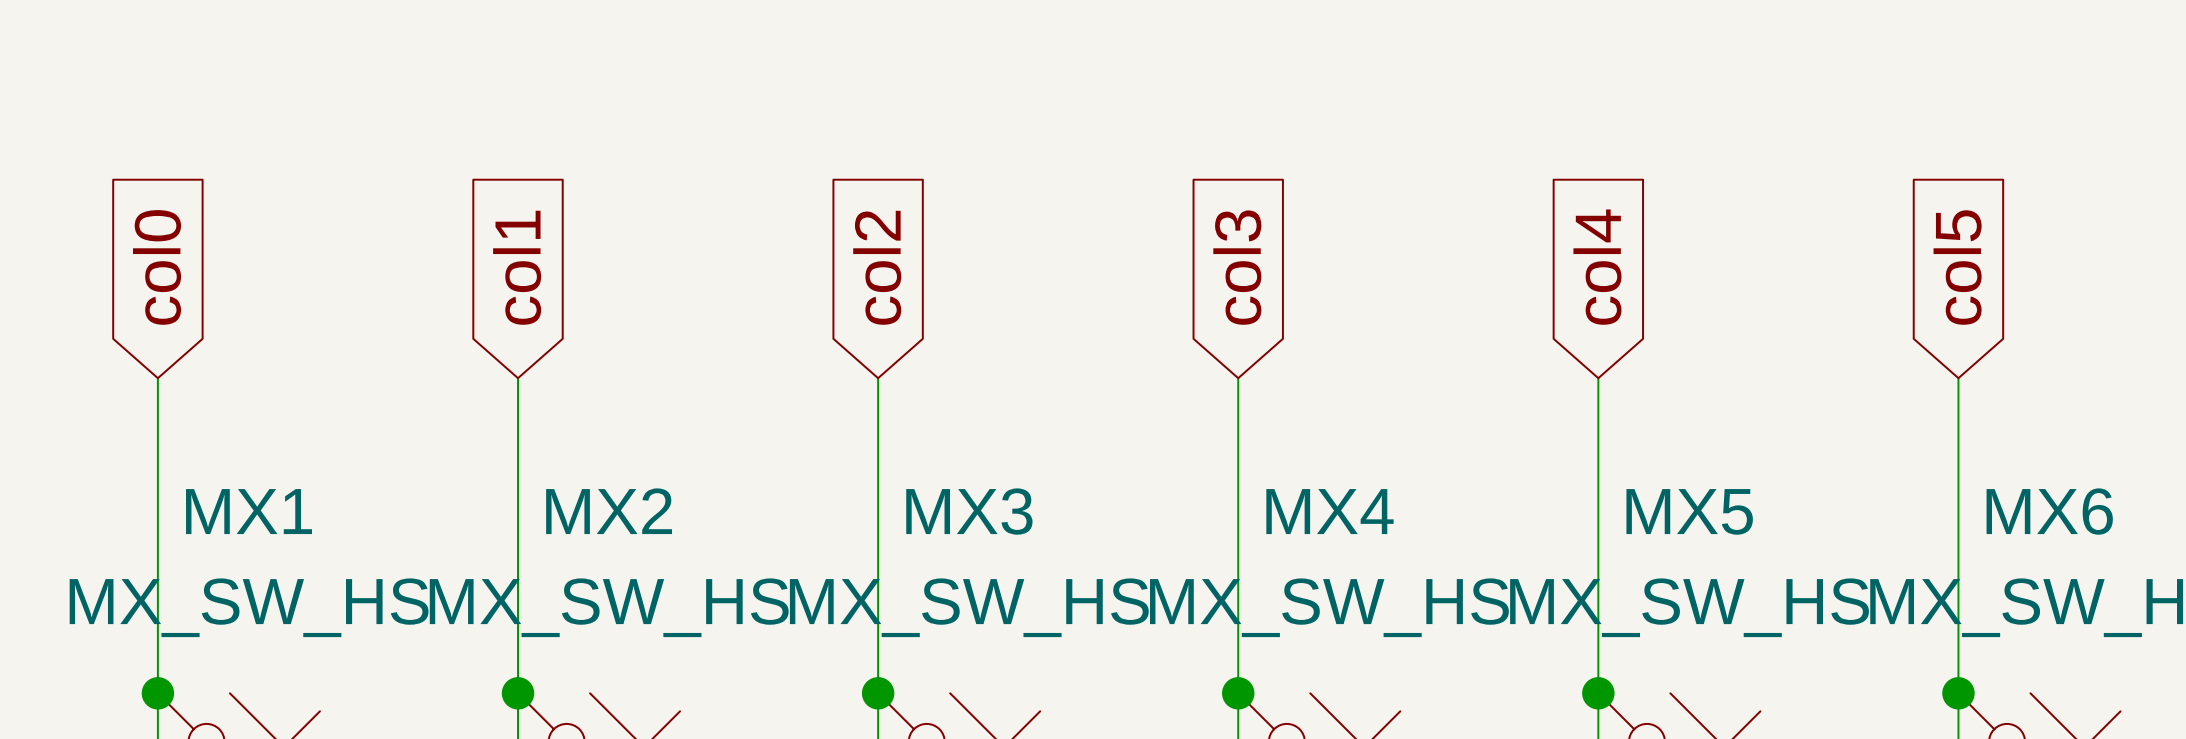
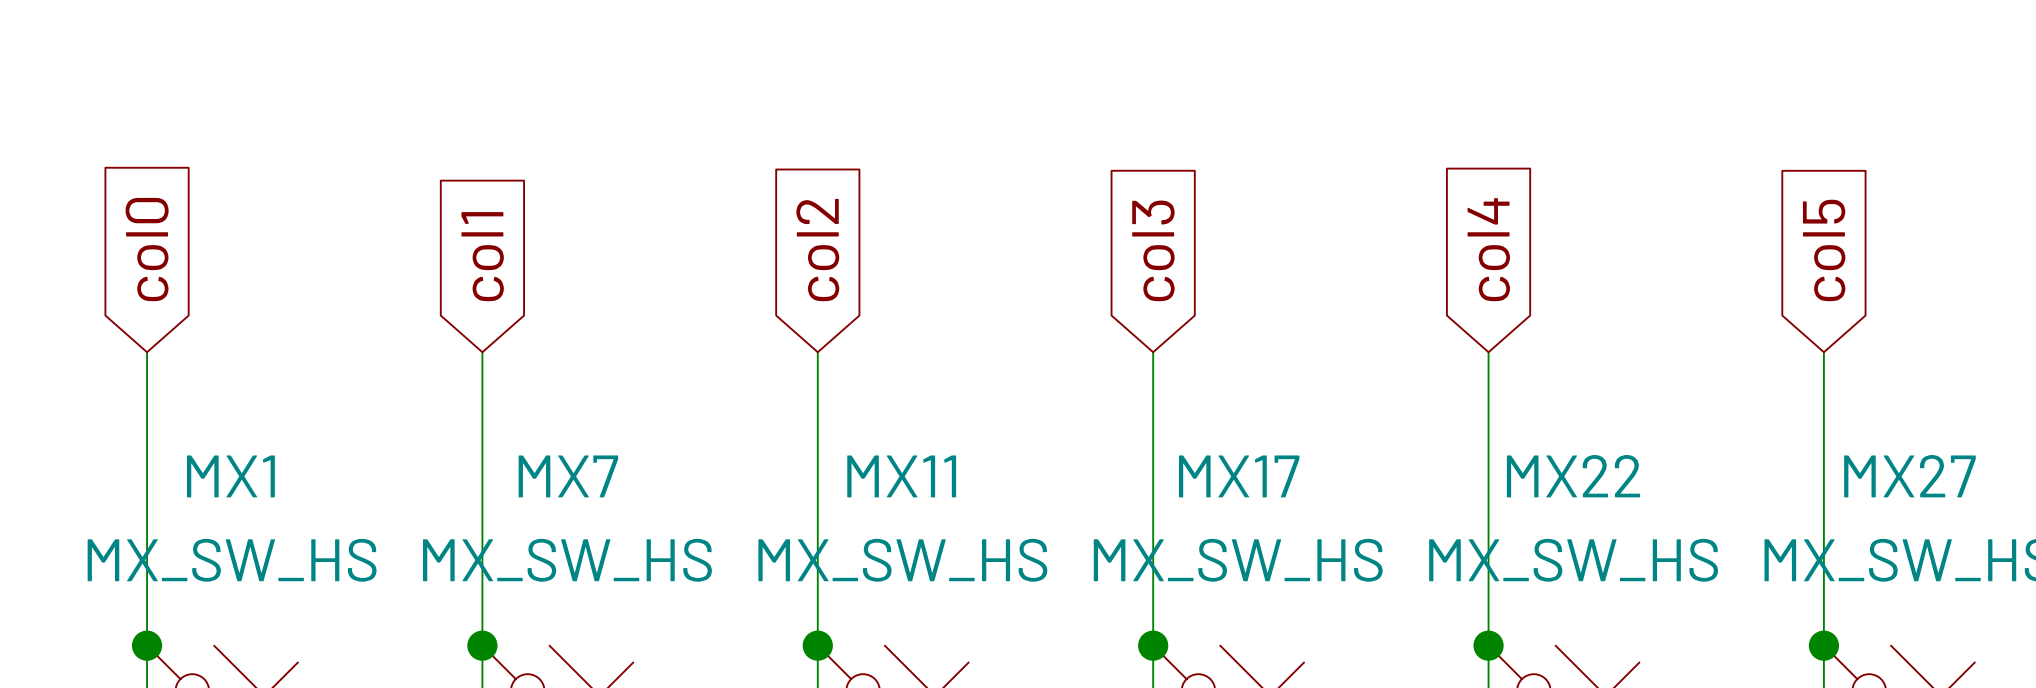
MX2 name: MX2 (609, 511) -> MX7 (568, 476)
MX3 name: MX3 (969, 511) -> MX11 (901, 476)
MX4 name: MX4 (1329, 511) -> MX17 (1239, 476)
MX5 name: MX5 (1689, 511) -> MX22 (1573, 476)
MX6 name: MX6 (2049, 511) -> MX27 (1909, 476)

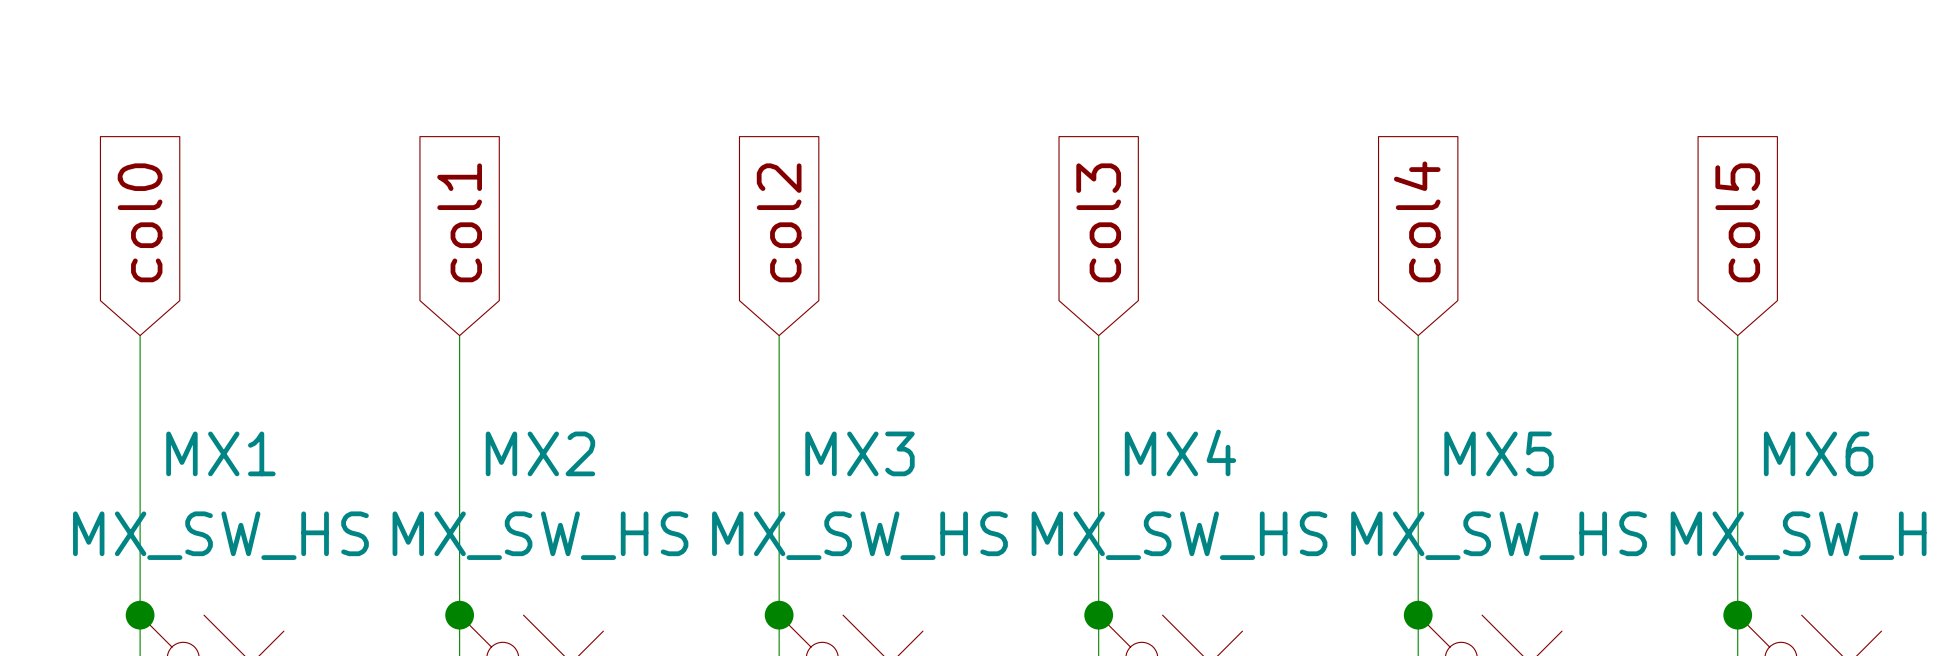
MX7 name: MX7 (568, 476) -> MX2 (540, 453)
MX11 name: MX11 (901, 476) -> MX3 (859, 453)
MX17 name: MX17 (1239, 476) -> MX4 (1180, 452)
MX22 name: MX22 (1573, 476) -> MX5 (1499, 453)
MX27 name: MX27 (1909, 476) -> MX6 (1818, 453)

